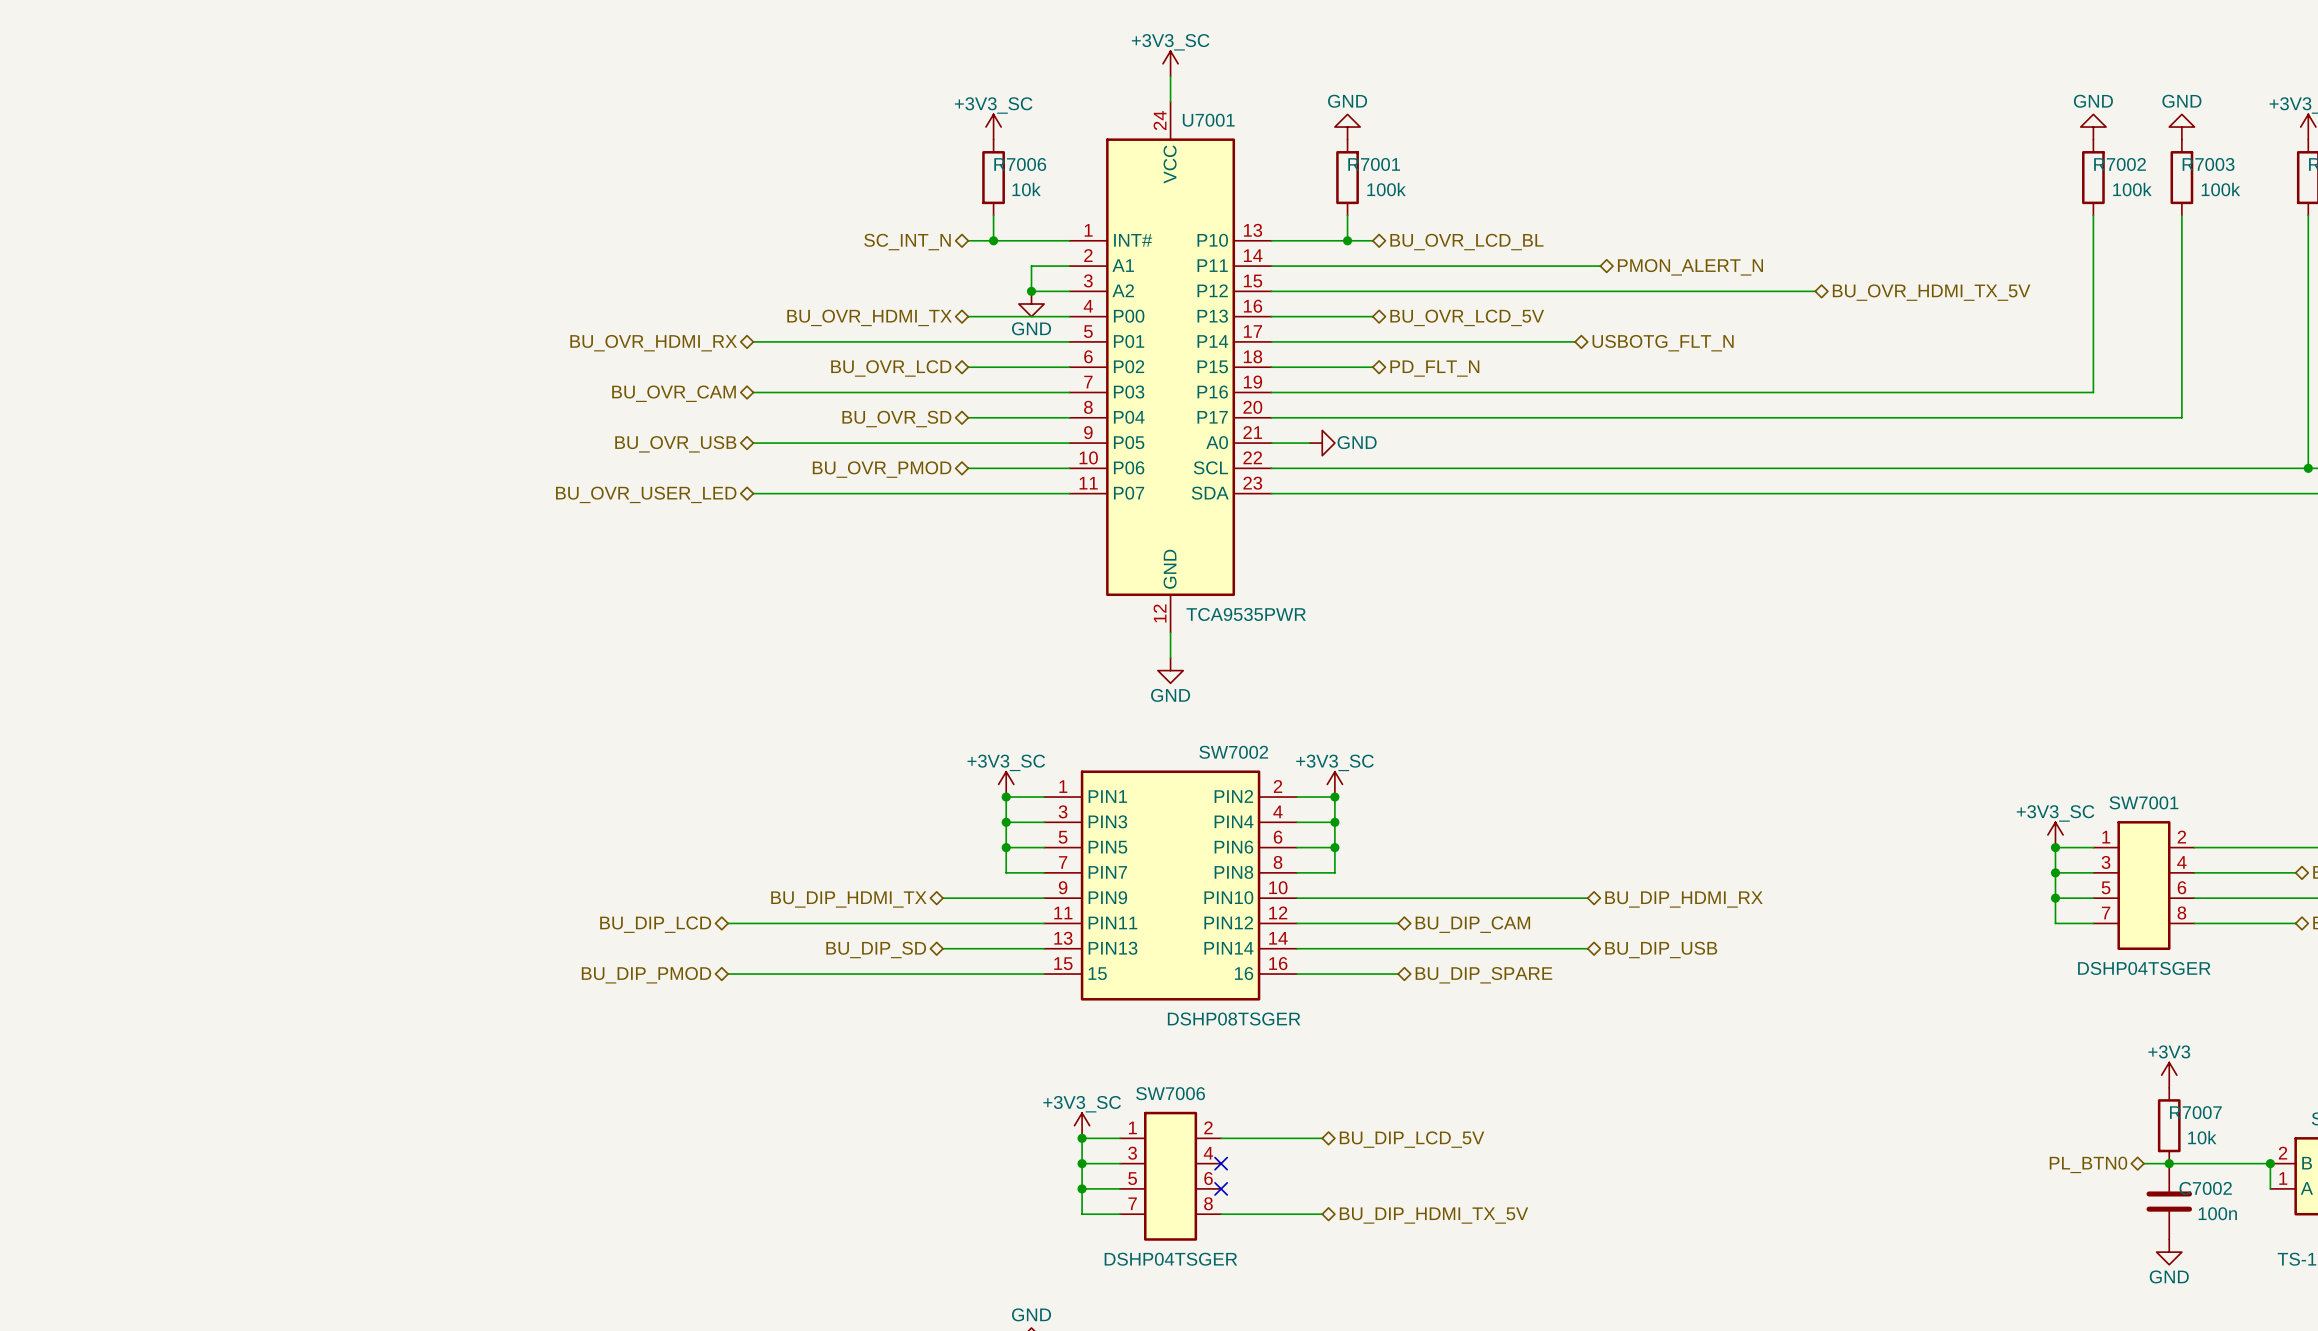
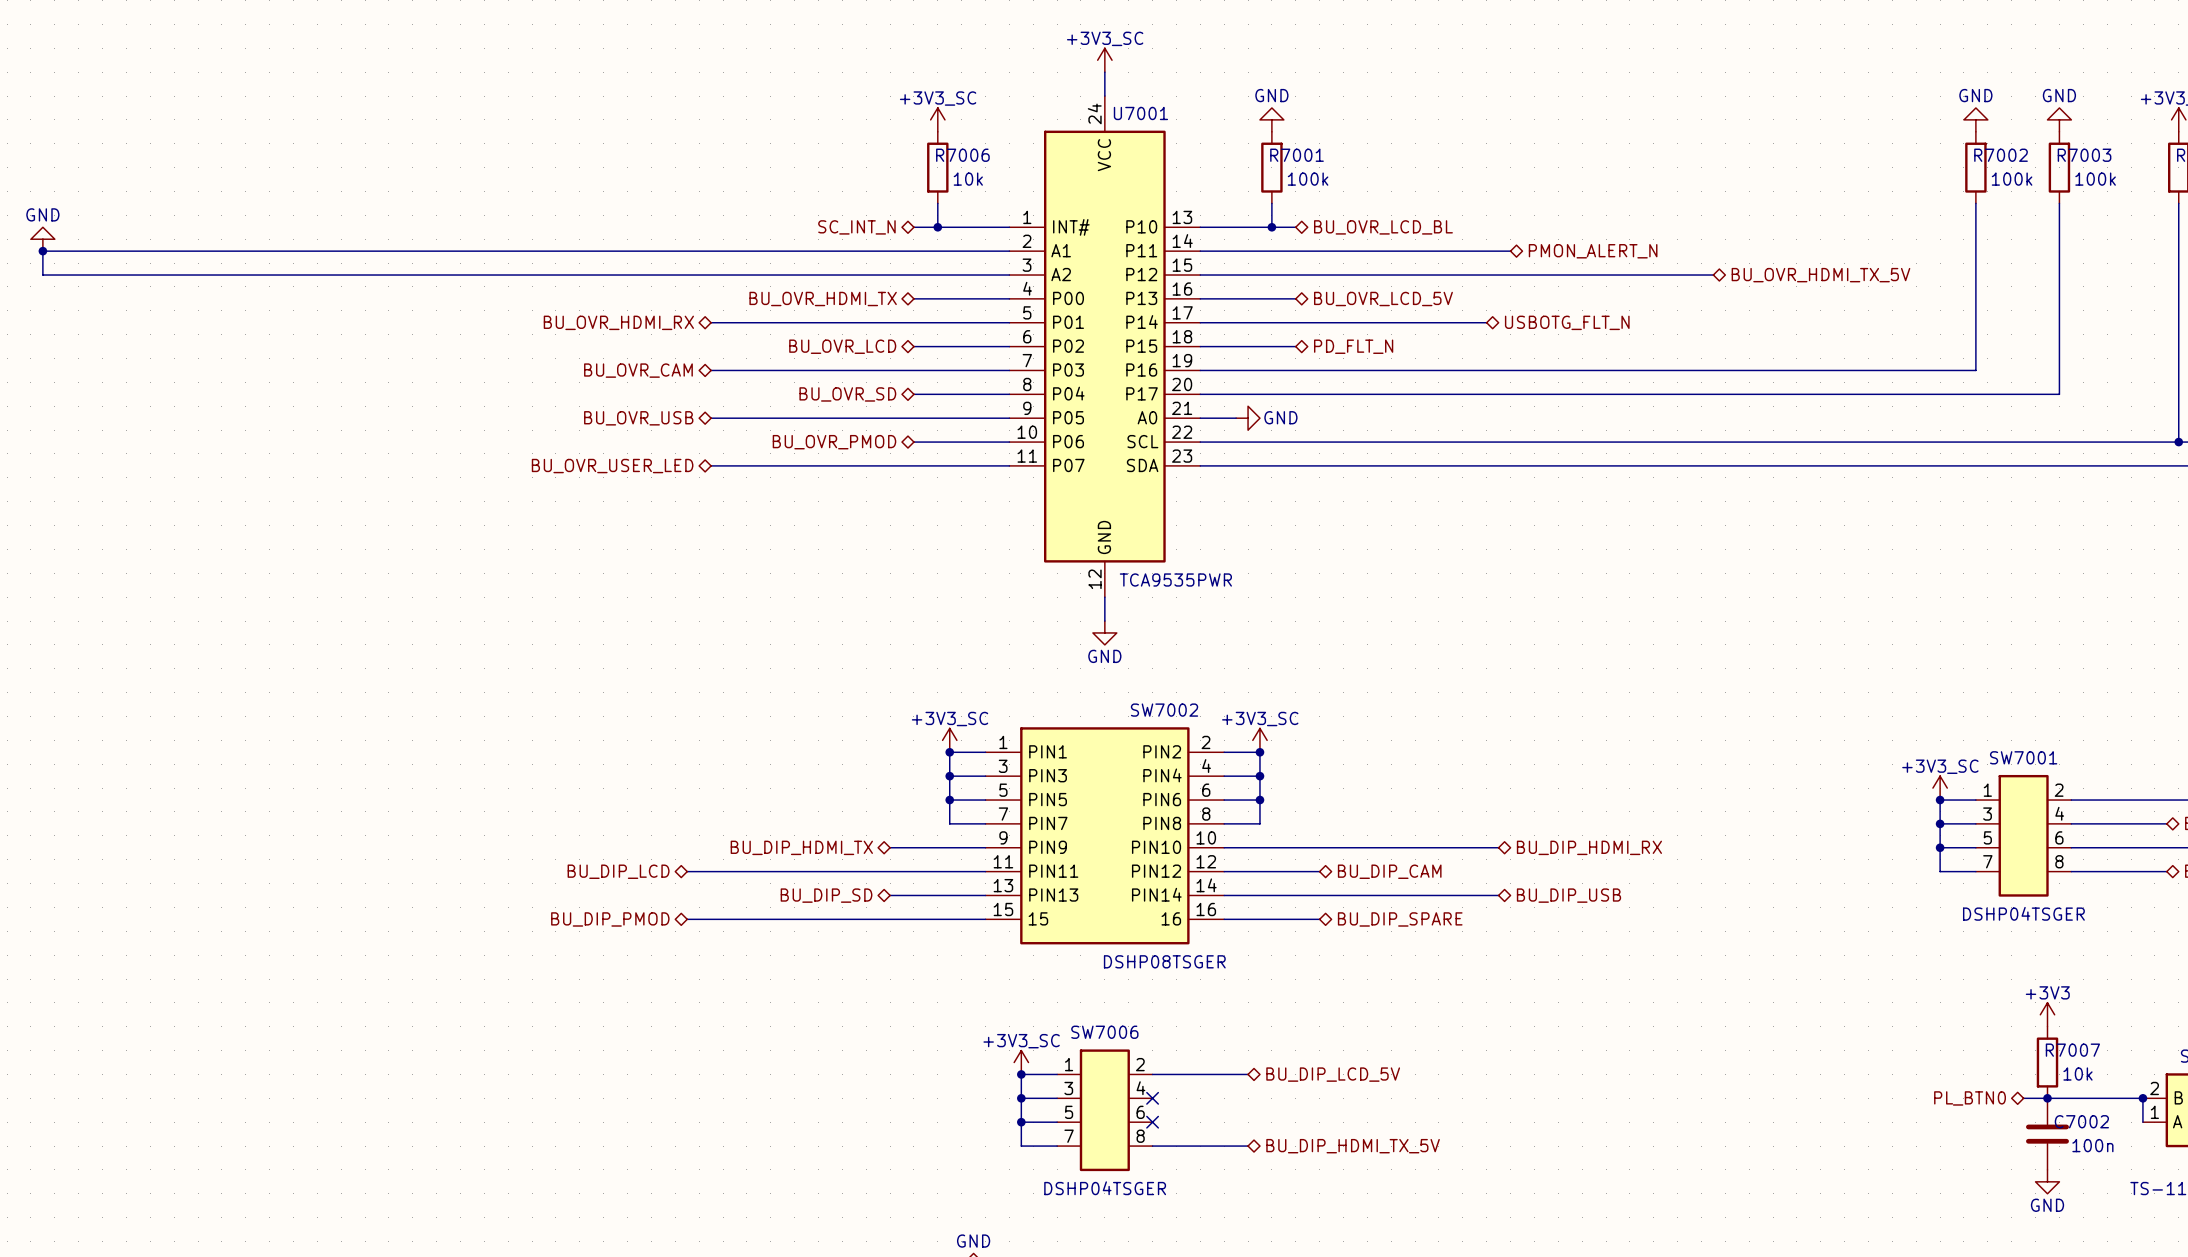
power symbol: none -> GND (42, 239)
junction: none -> (42, 251)
wire: (1031, 266) (1031, 291) -> (973, 251) (42, 251) (42, 275) (973, 275)
junction: (1031, 291) -> none
power symbol: GND (1031, 304) -> none

